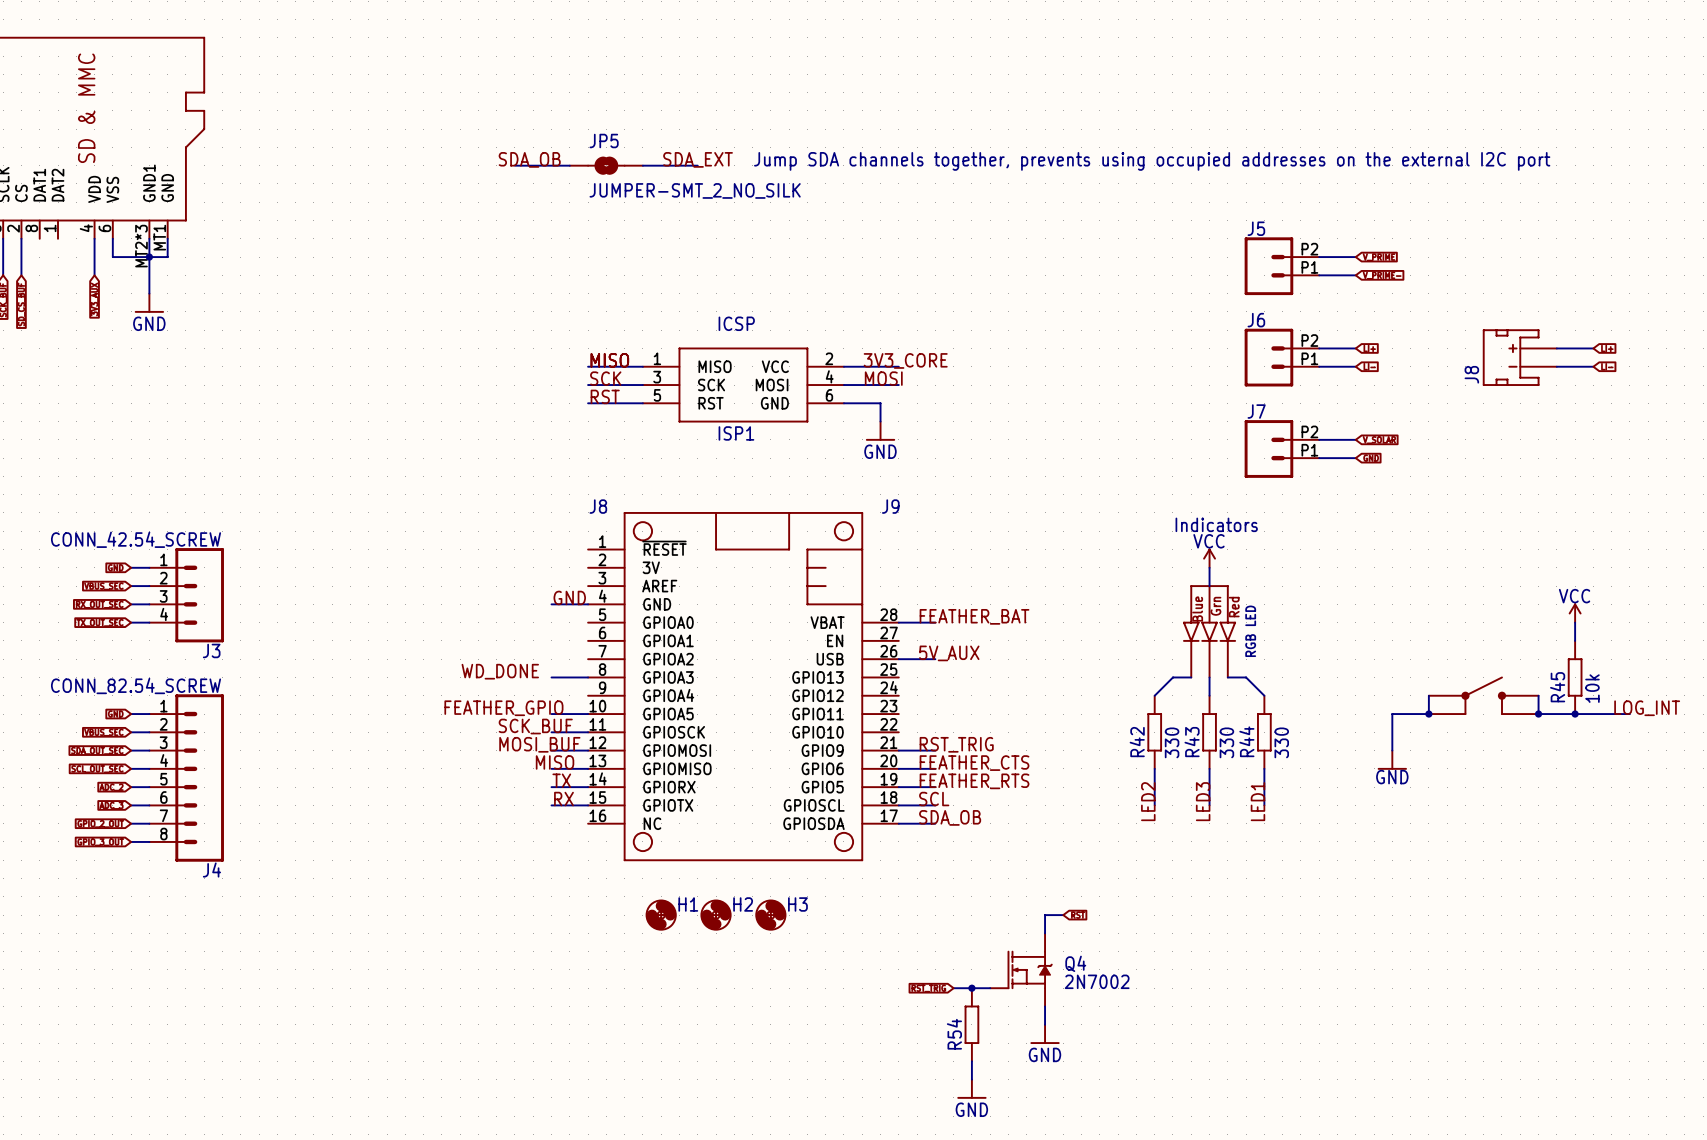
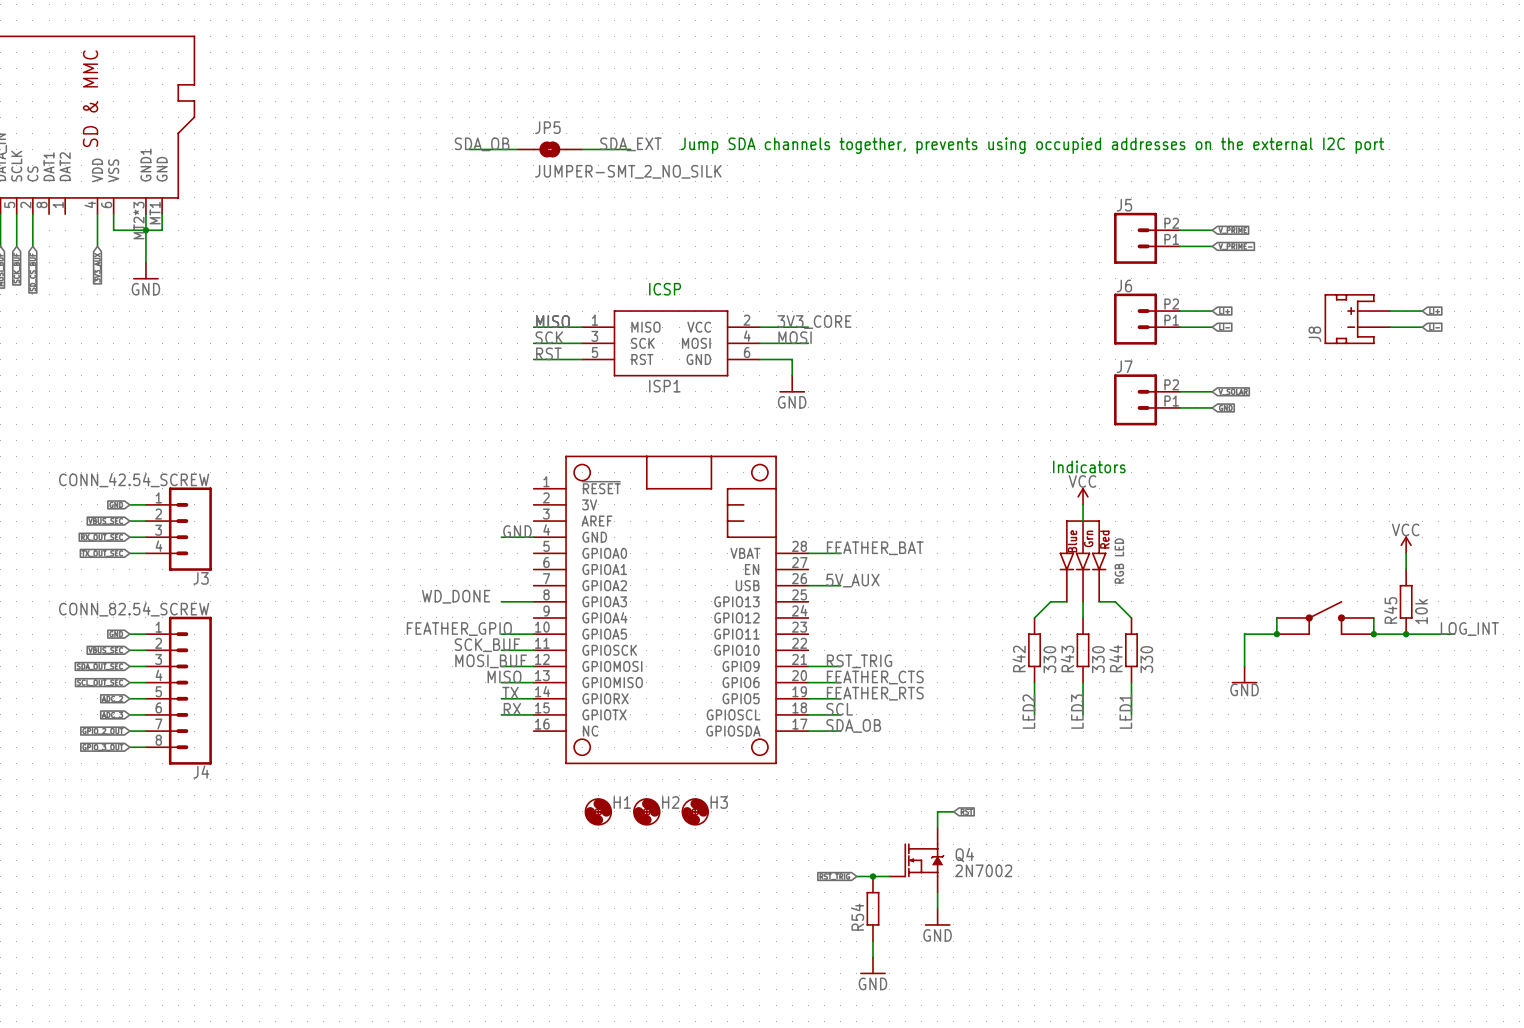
text: J8 (598, 506) -> none
text: J9 (890, 506) -> none

